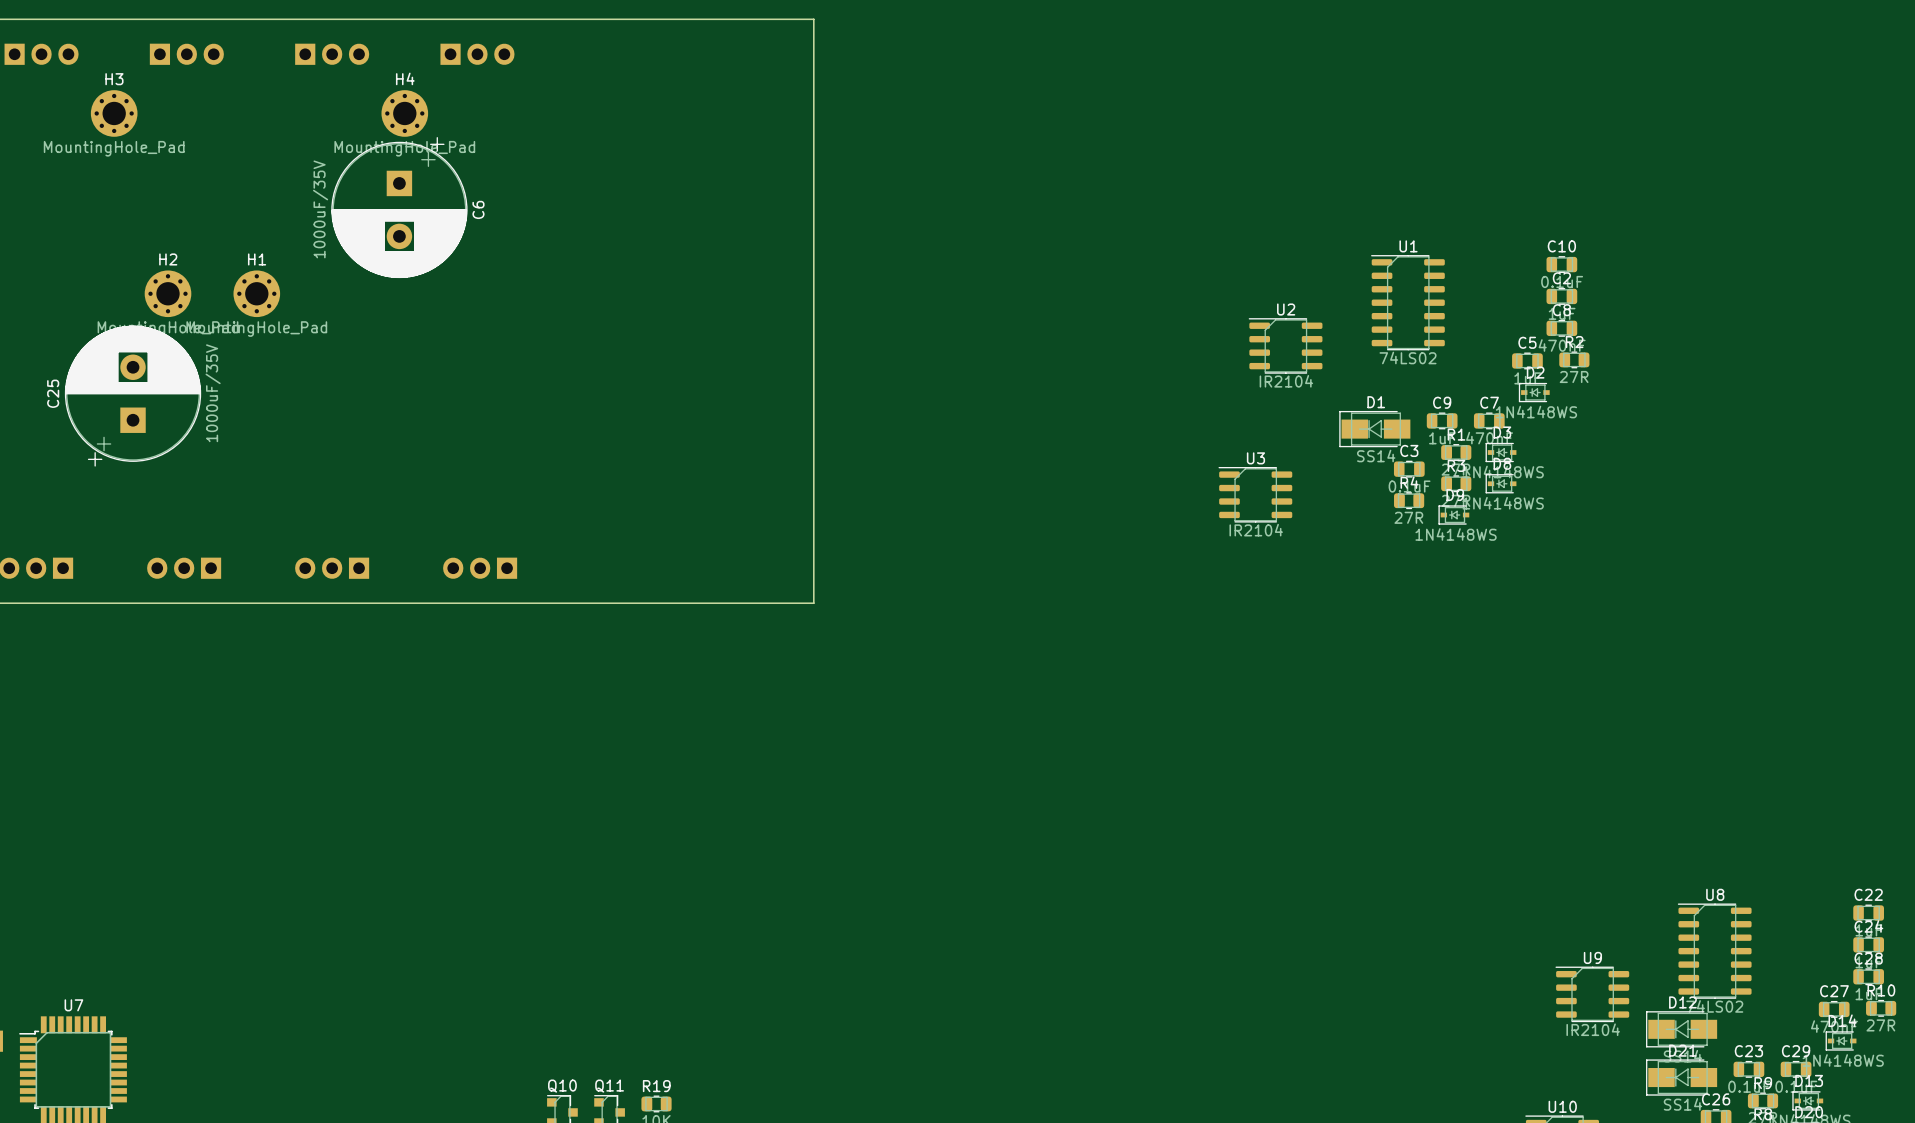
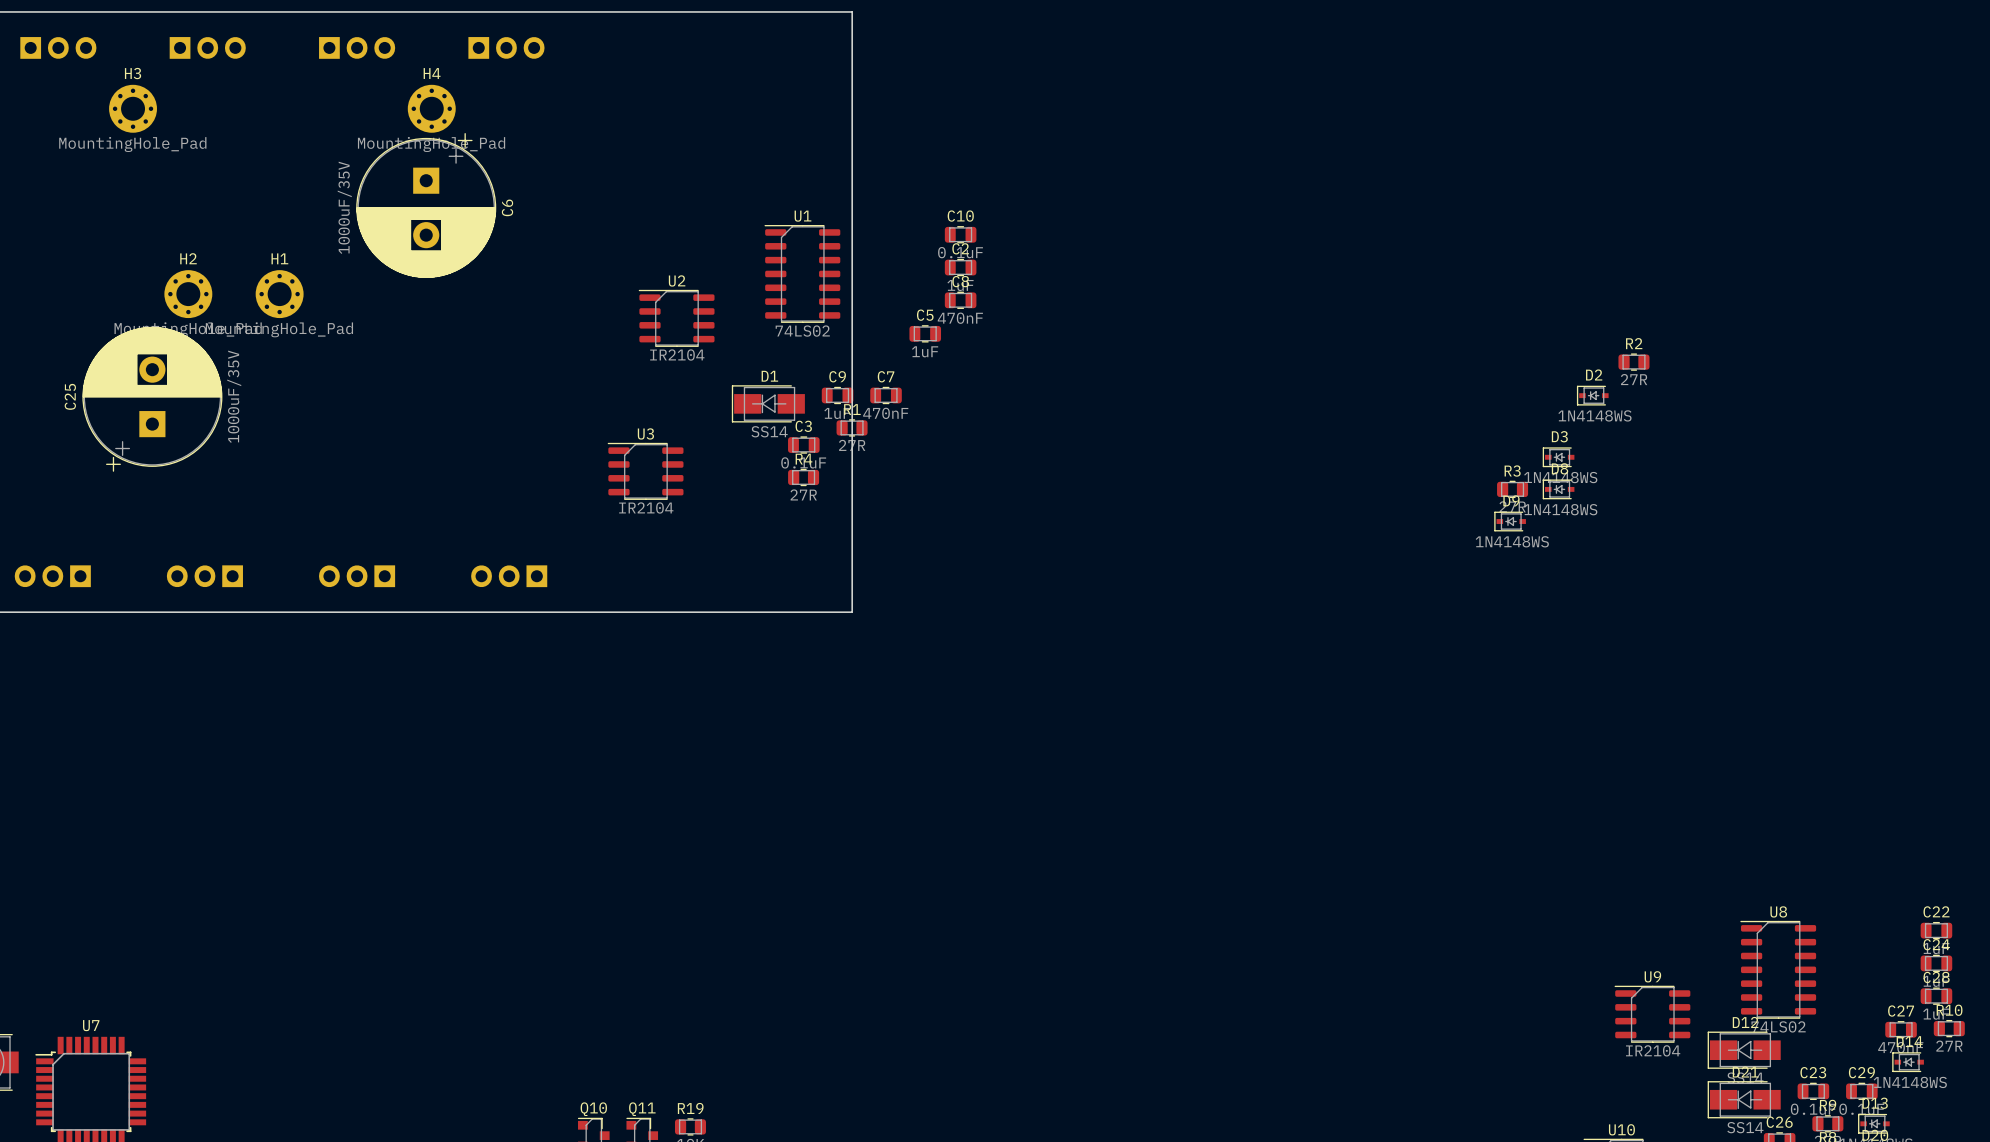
C10 position: (1561, 264) -> (960, 234)
C2 position: (1561, 296) -> (960, 267)
U1 position: (1407, 302) -> (802, 273)
C8 position: (1561, 328) -> (960, 300)
U2 position: (1285, 345) -> (676, 318)
C5 position: (1527, 360) -> (925, 333)
C9 position: (1442, 420) -> (837, 395)
C7 position: (1489, 420) -> (886, 395)
D1 position: (1374, 429) -> (768, 403)
R1 position: (1456, 452) -> (852, 427)
C3 position: (1409, 469) -> (803, 445)
U3 position: (1255, 494) -> (645, 471)
R4 position: (1409, 500) -> (803, 477)

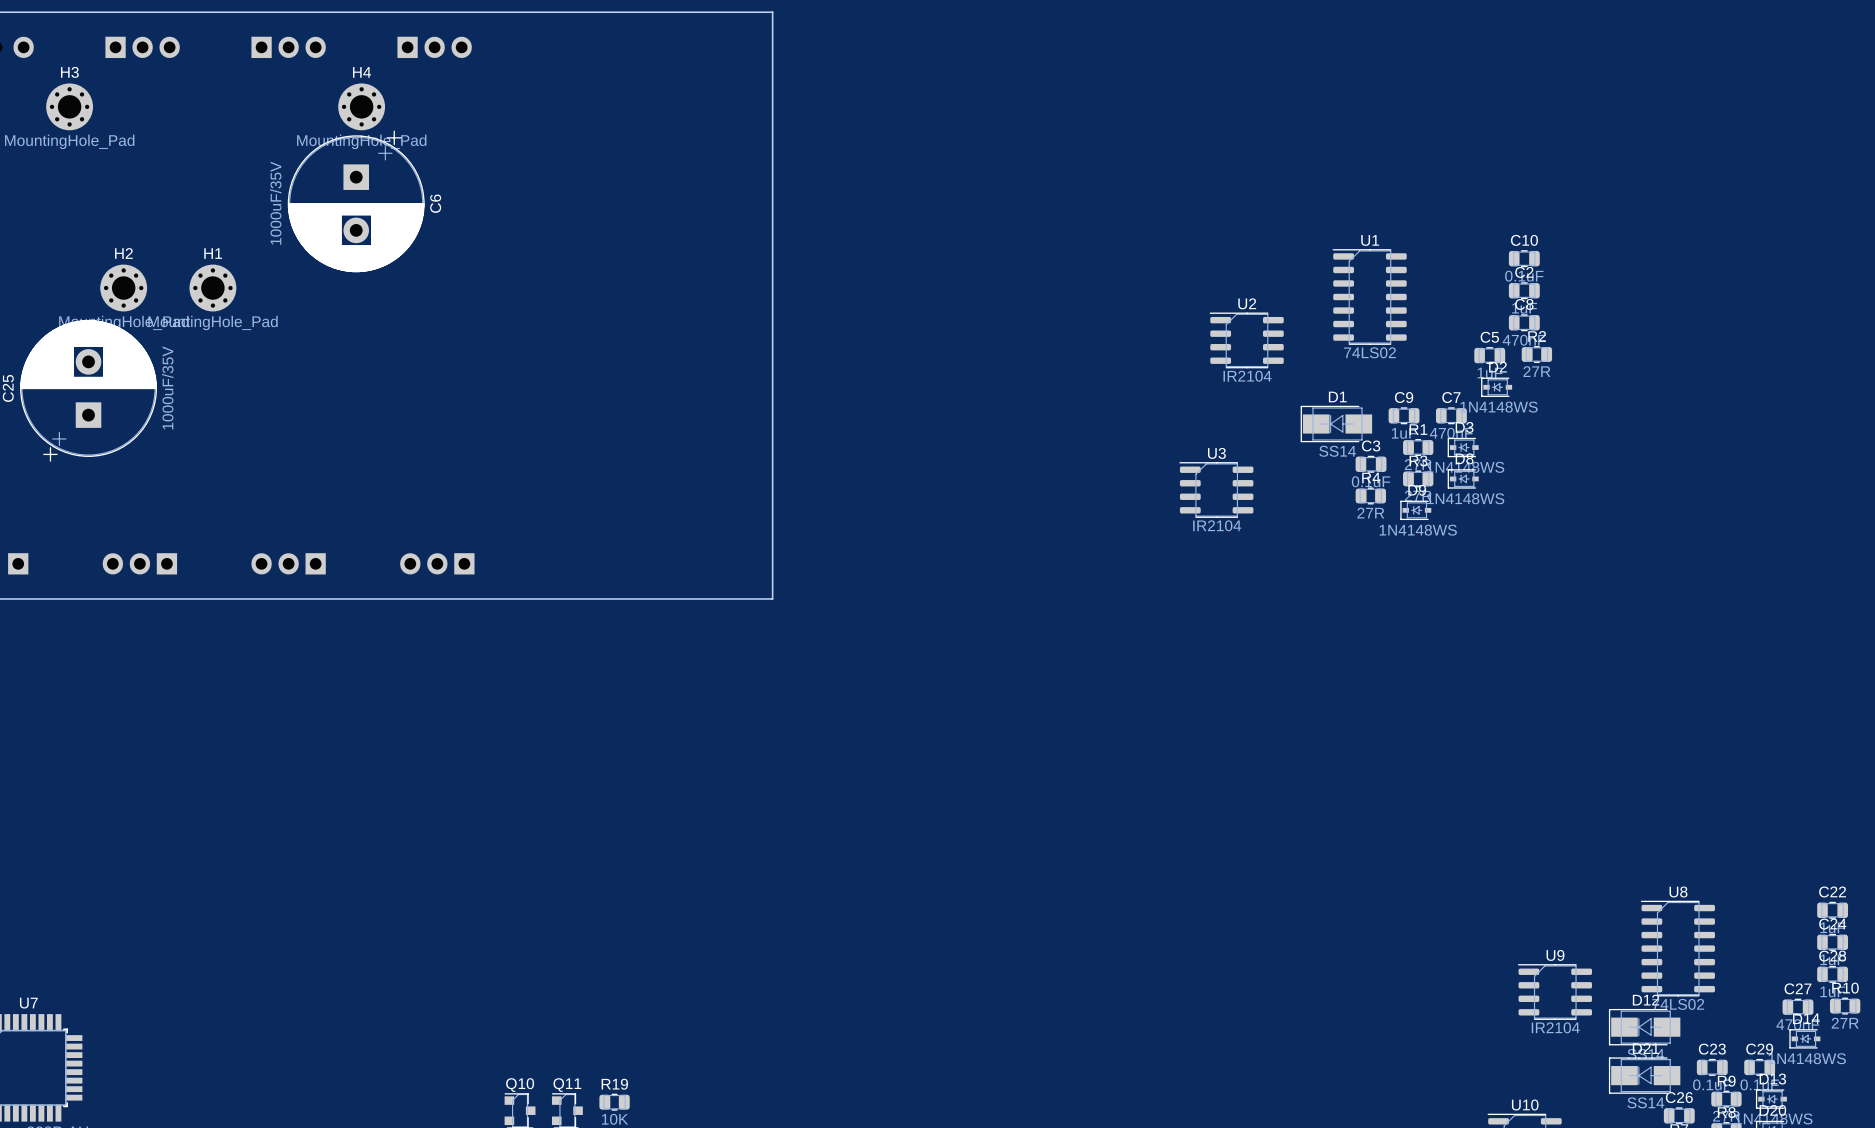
C10 position: (960, 234) -> (1524, 258)
C2 position: (960, 267) -> (1524, 290)
U1 position: (802, 273) -> (1369, 297)
C8 position: (960, 300) -> (1524, 322)
U2 position: (676, 318) -> (1246, 340)
C5 position: (925, 333) -> (1489, 355)
C9 position: (837, 395) -> (1404, 415)
C7 position: (886, 395) -> (1451, 415)
D1 position: (768, 403) -> (1336, 424)
R1 position: (852, 427) -> (1418, 447)
C3 position: (803, 445) -> (1371, 464)
U3 position: (645, 471) -> (1216, 490)
R4 position: (803, 477) -> (1370, 495)

